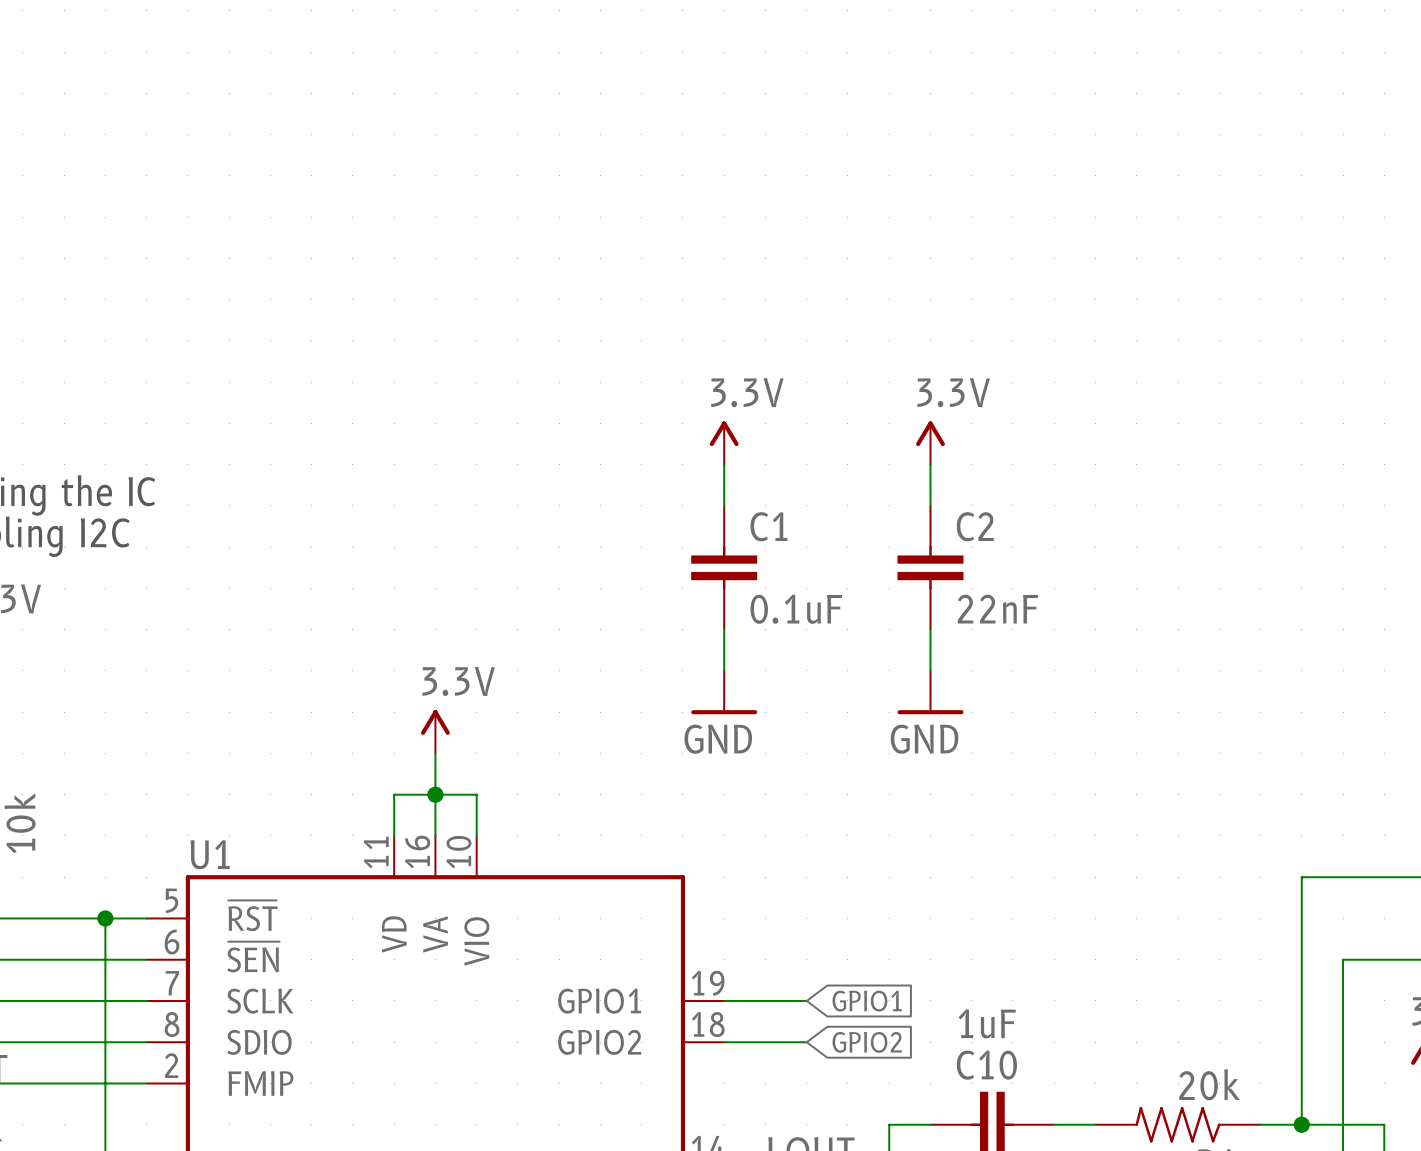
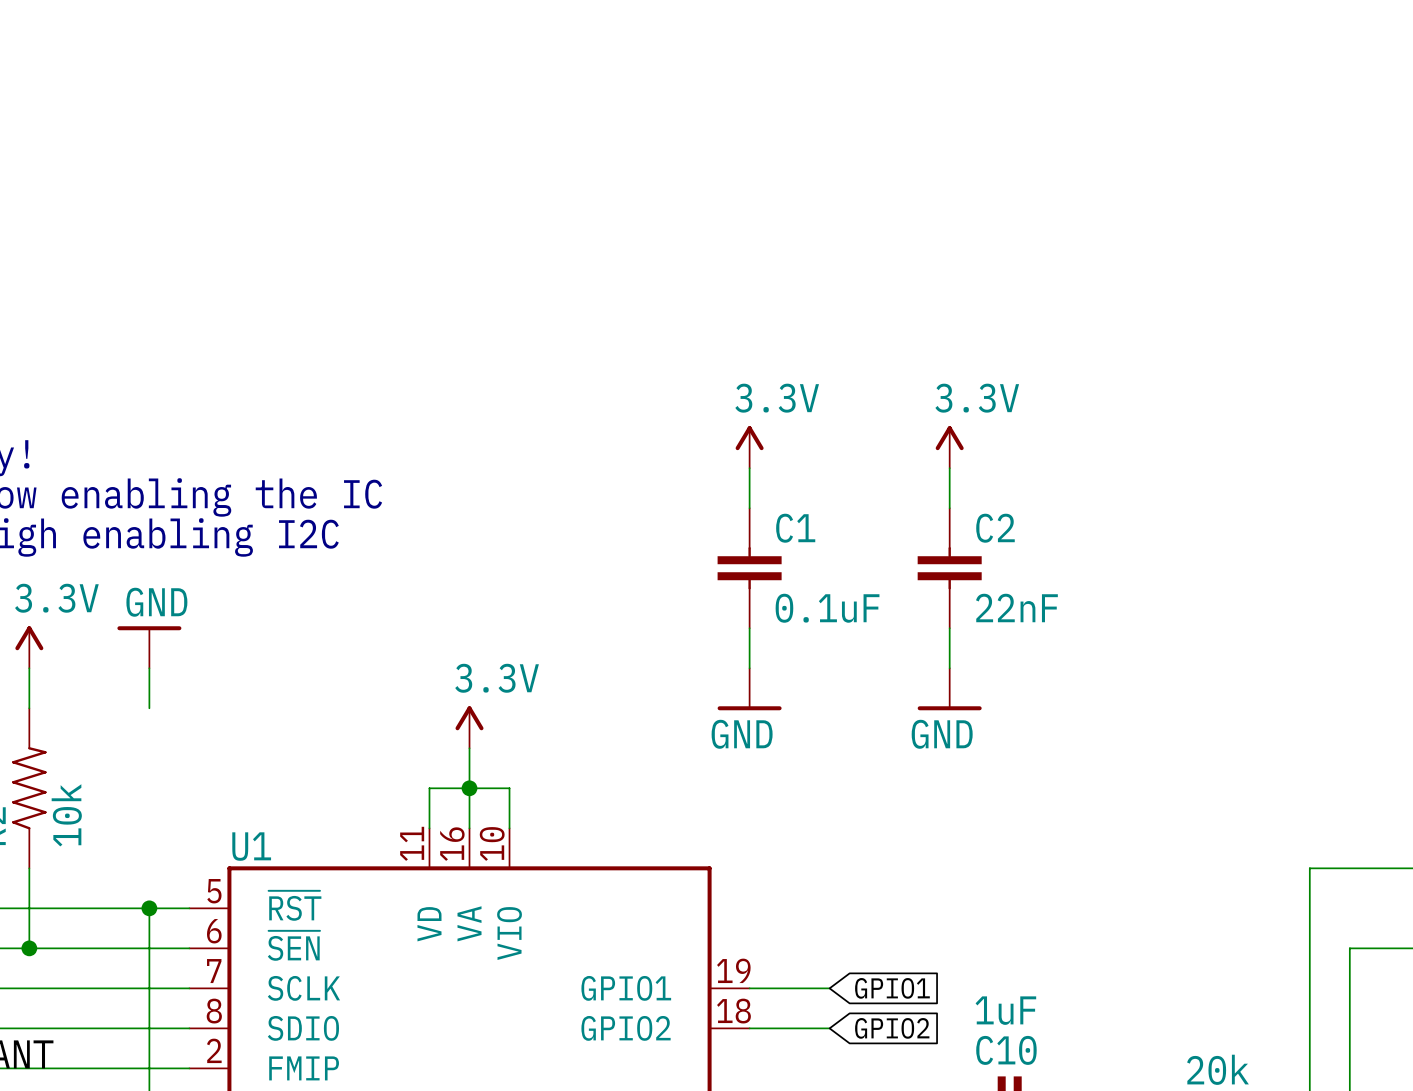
power symbol: none -> GND (149, 647)
wire: none -> (149, 668) (149, 708)

